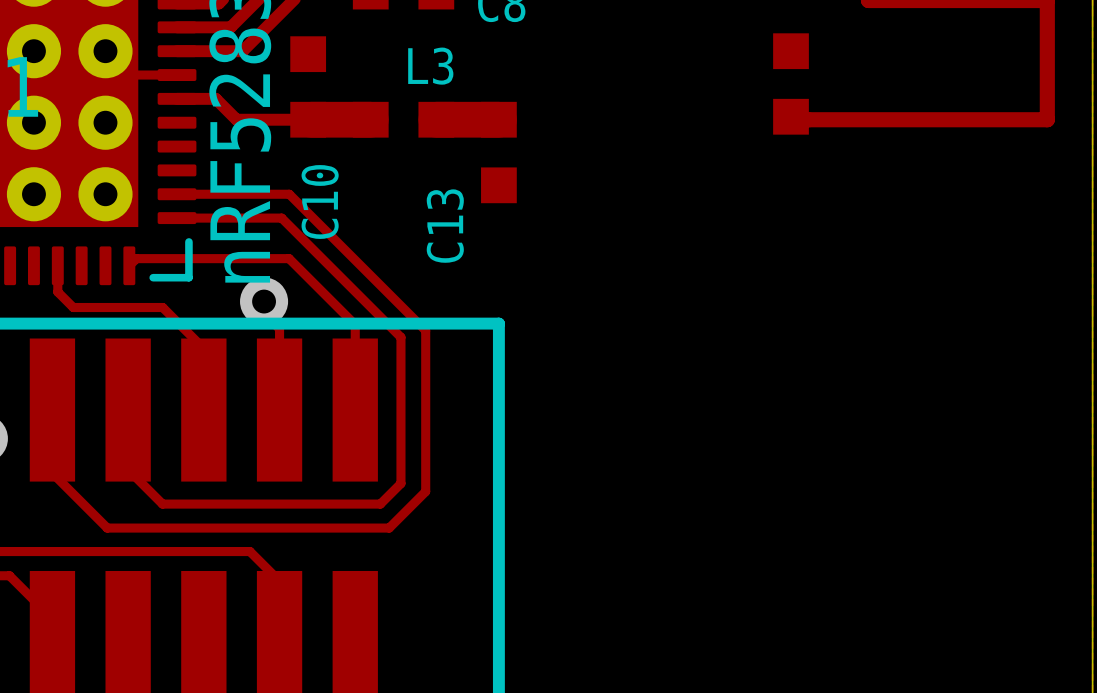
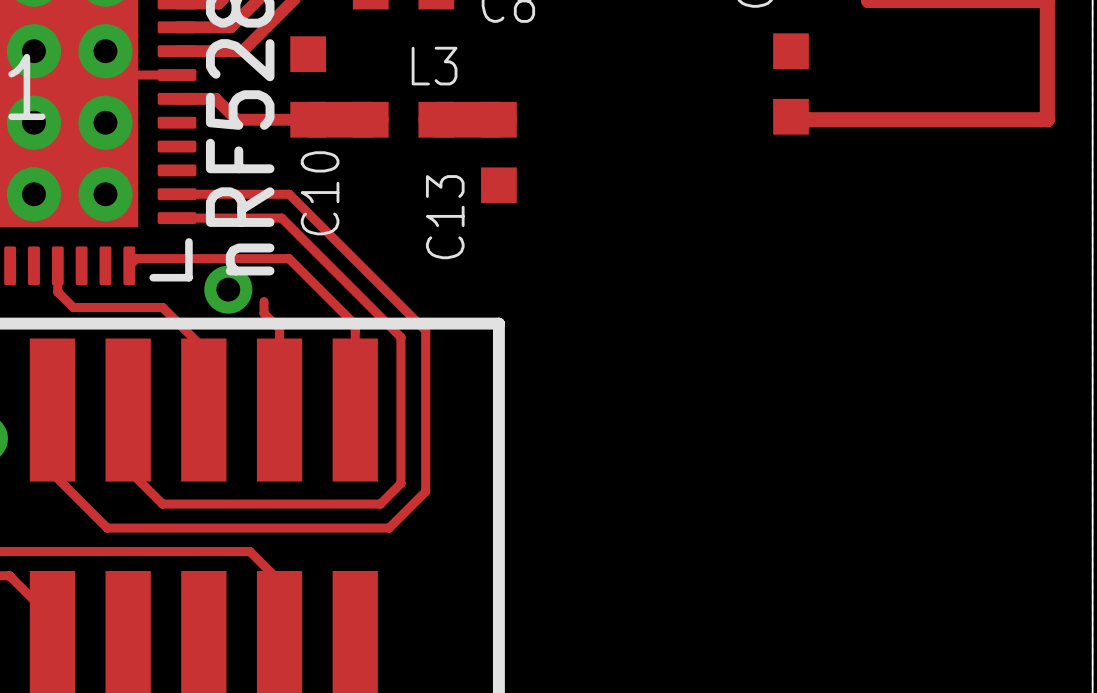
via position: (264, 301) -> (228, 289)

